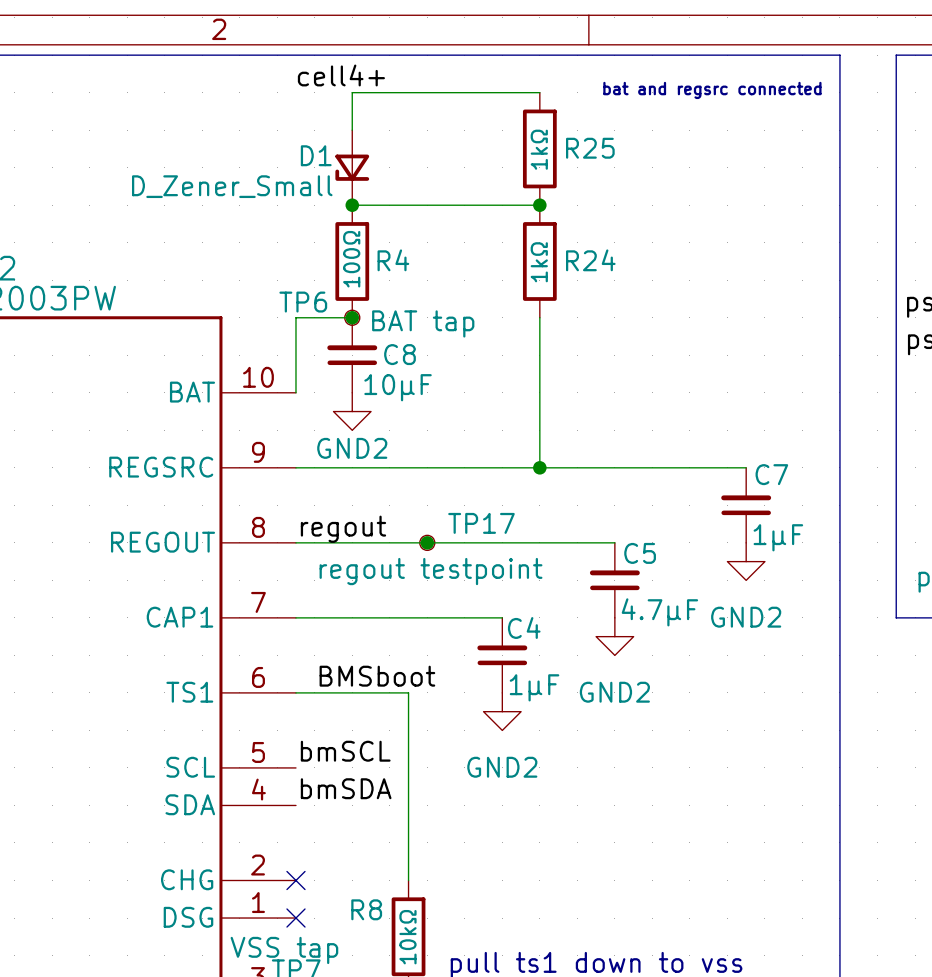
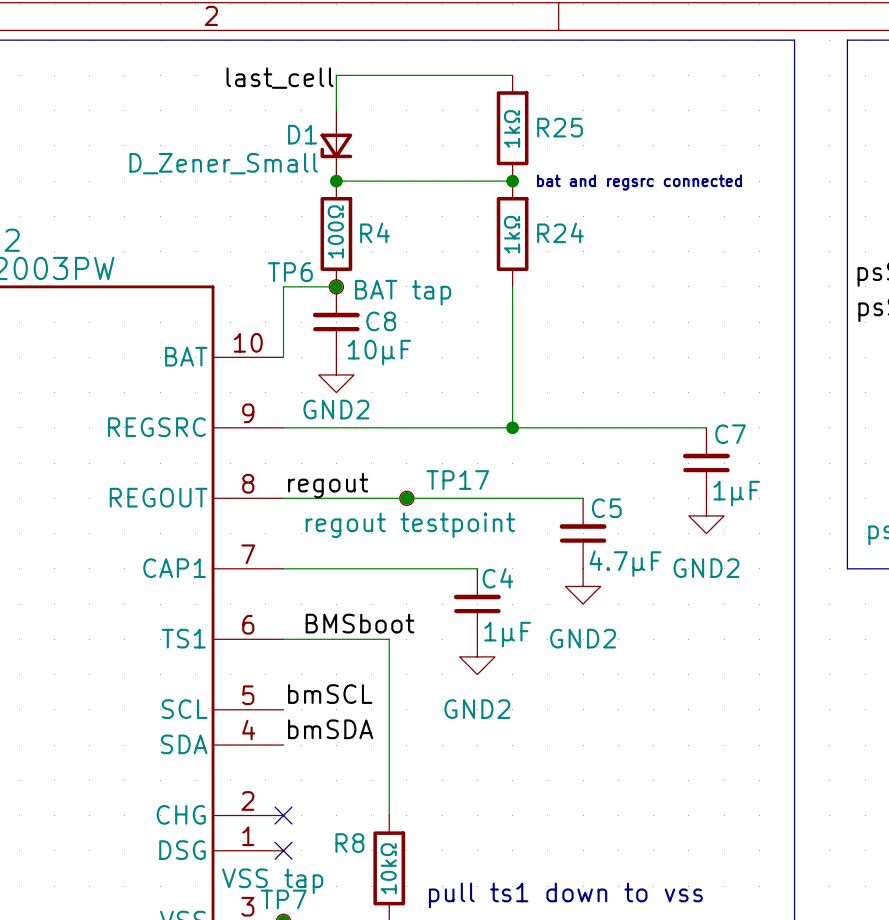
label: cell4+ (341, 75) -> none
text position: bat and regsrc connected (712, 90) -> bat and regsrc connected (639, 182)
label: none -> last_cell (280, 78)

